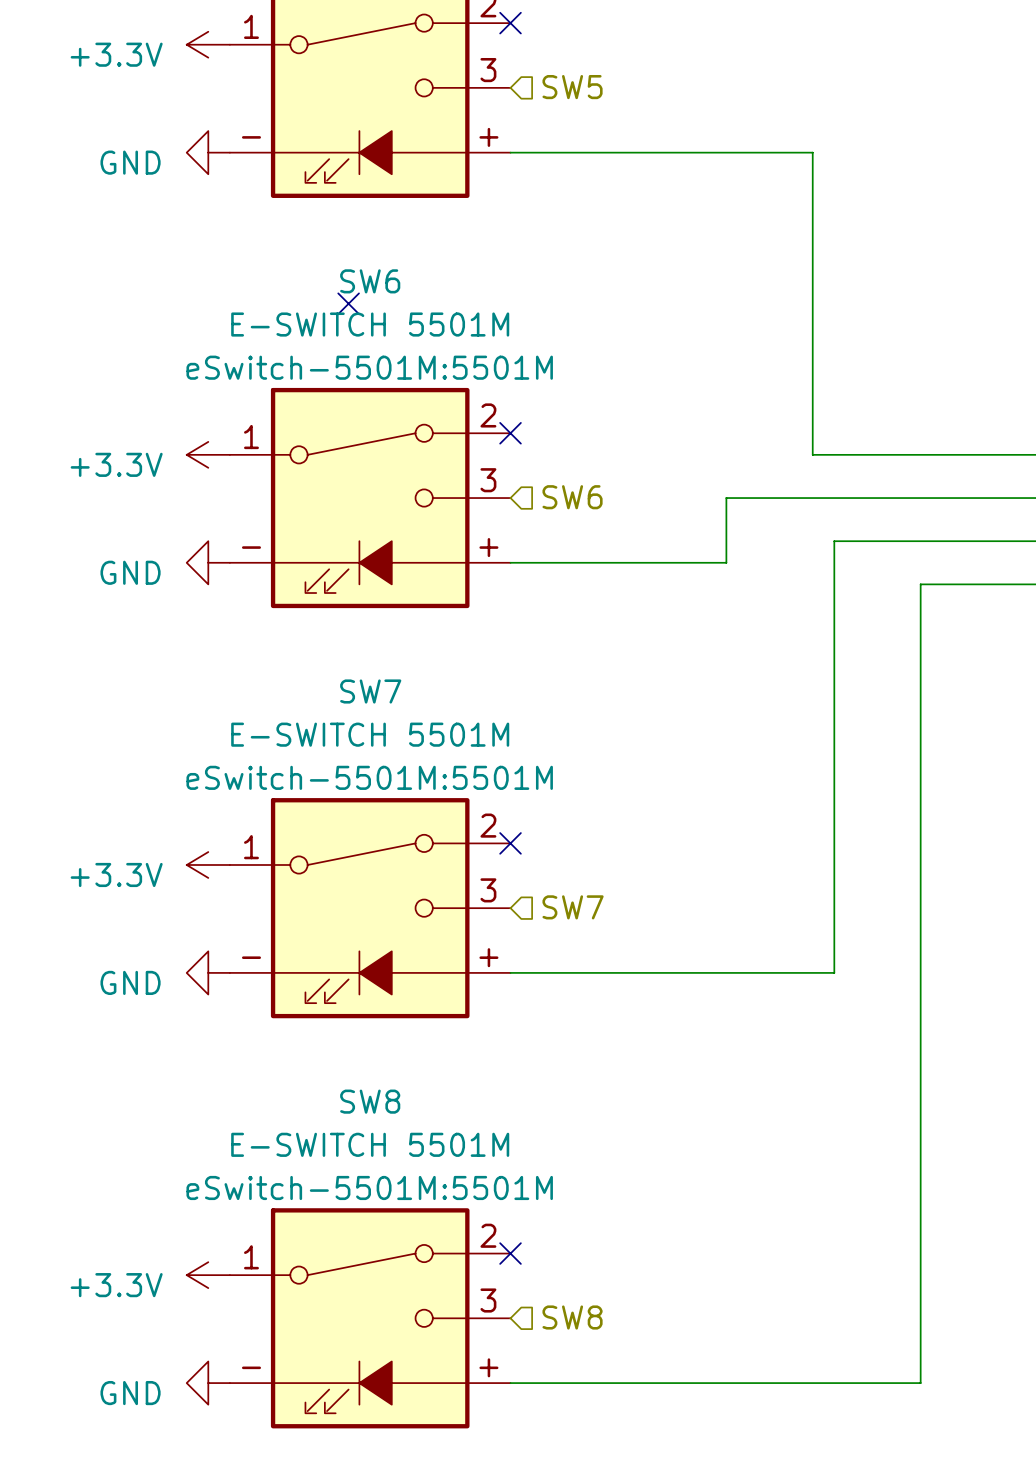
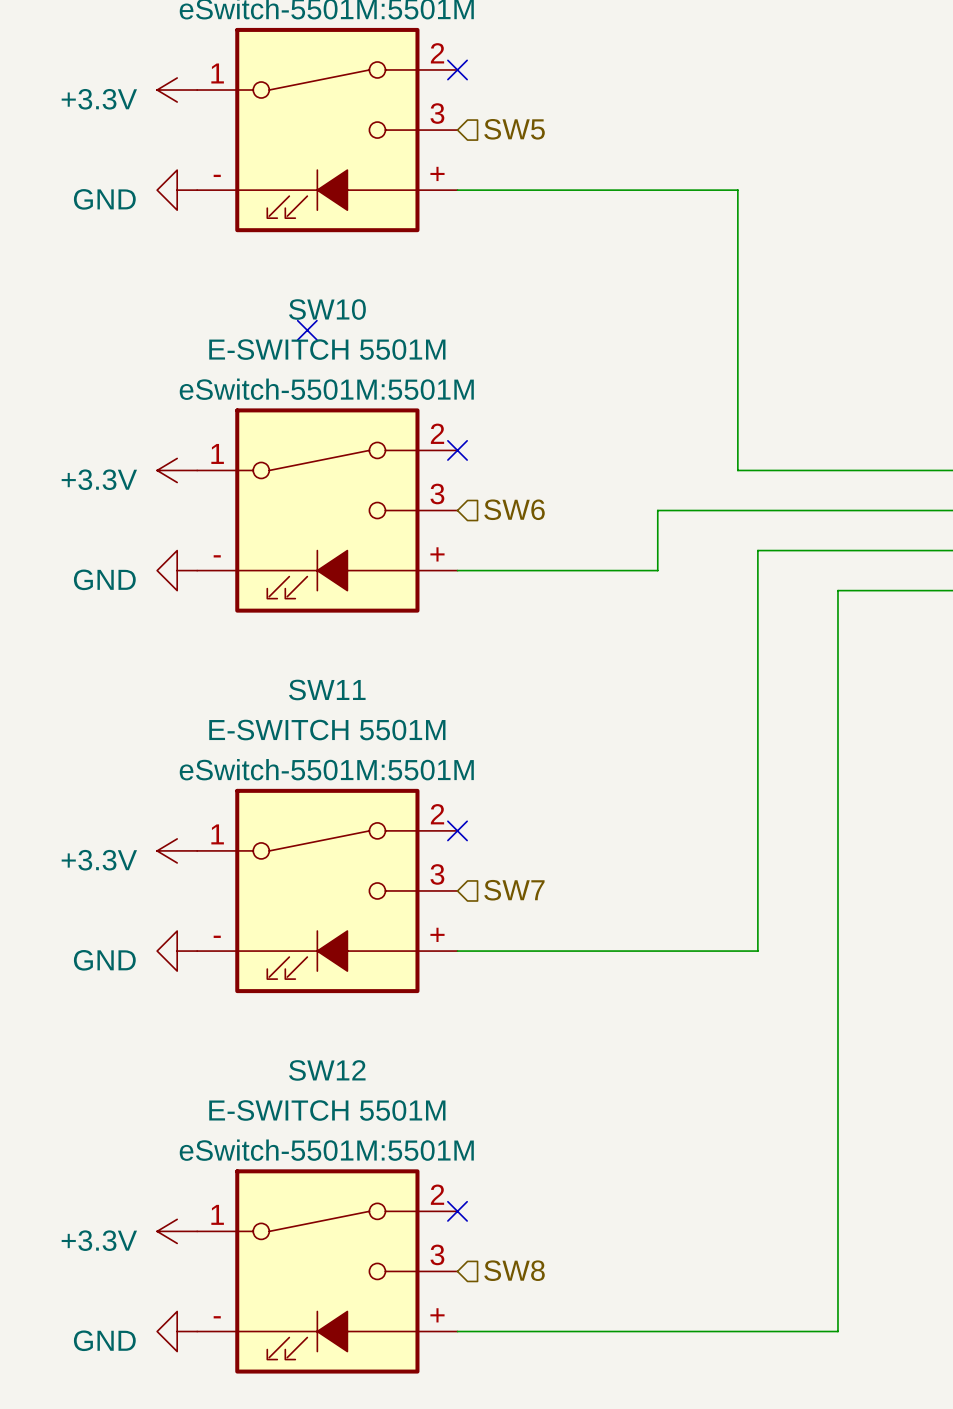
SW6 name: SW6 (370, 281) -> SW10 (327, 309)
SW7 name: SW7 (370, 691) -> SW11 (327, 689)
SW8 name: SW8 (370, 1101) -> SW12 (327, 1070)

